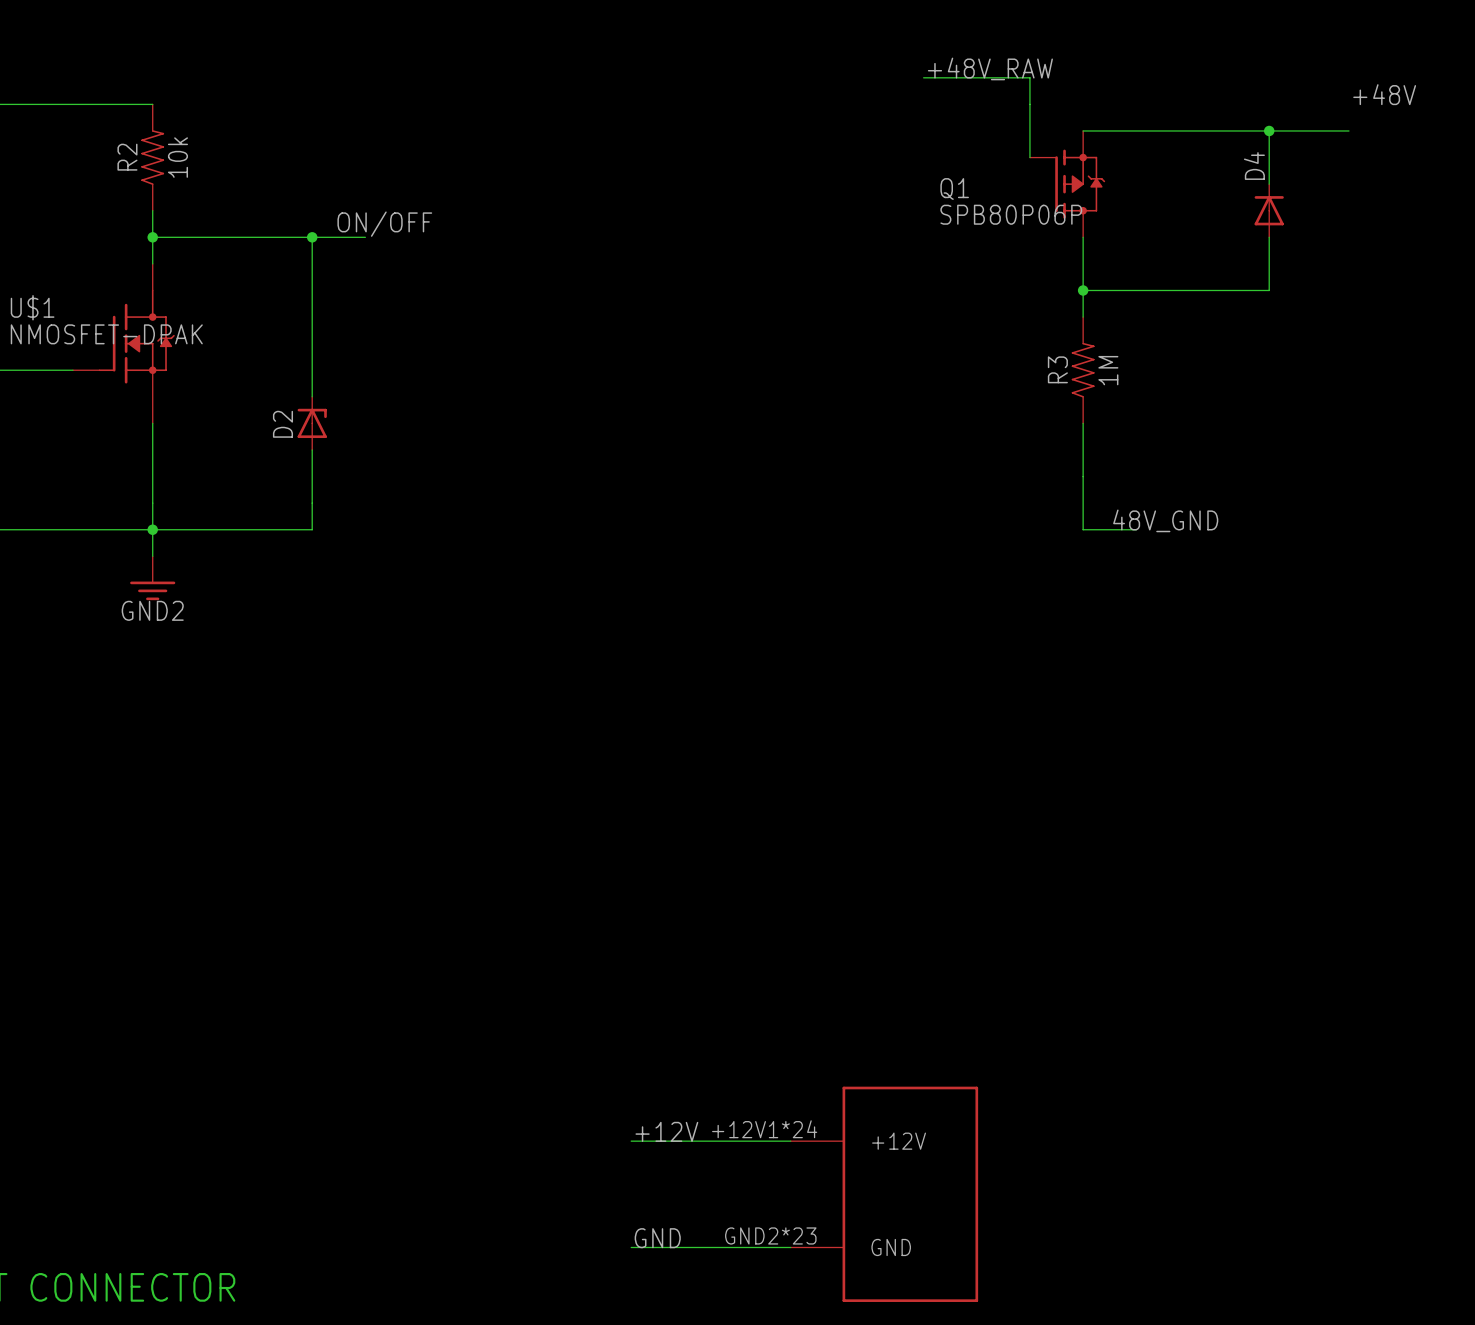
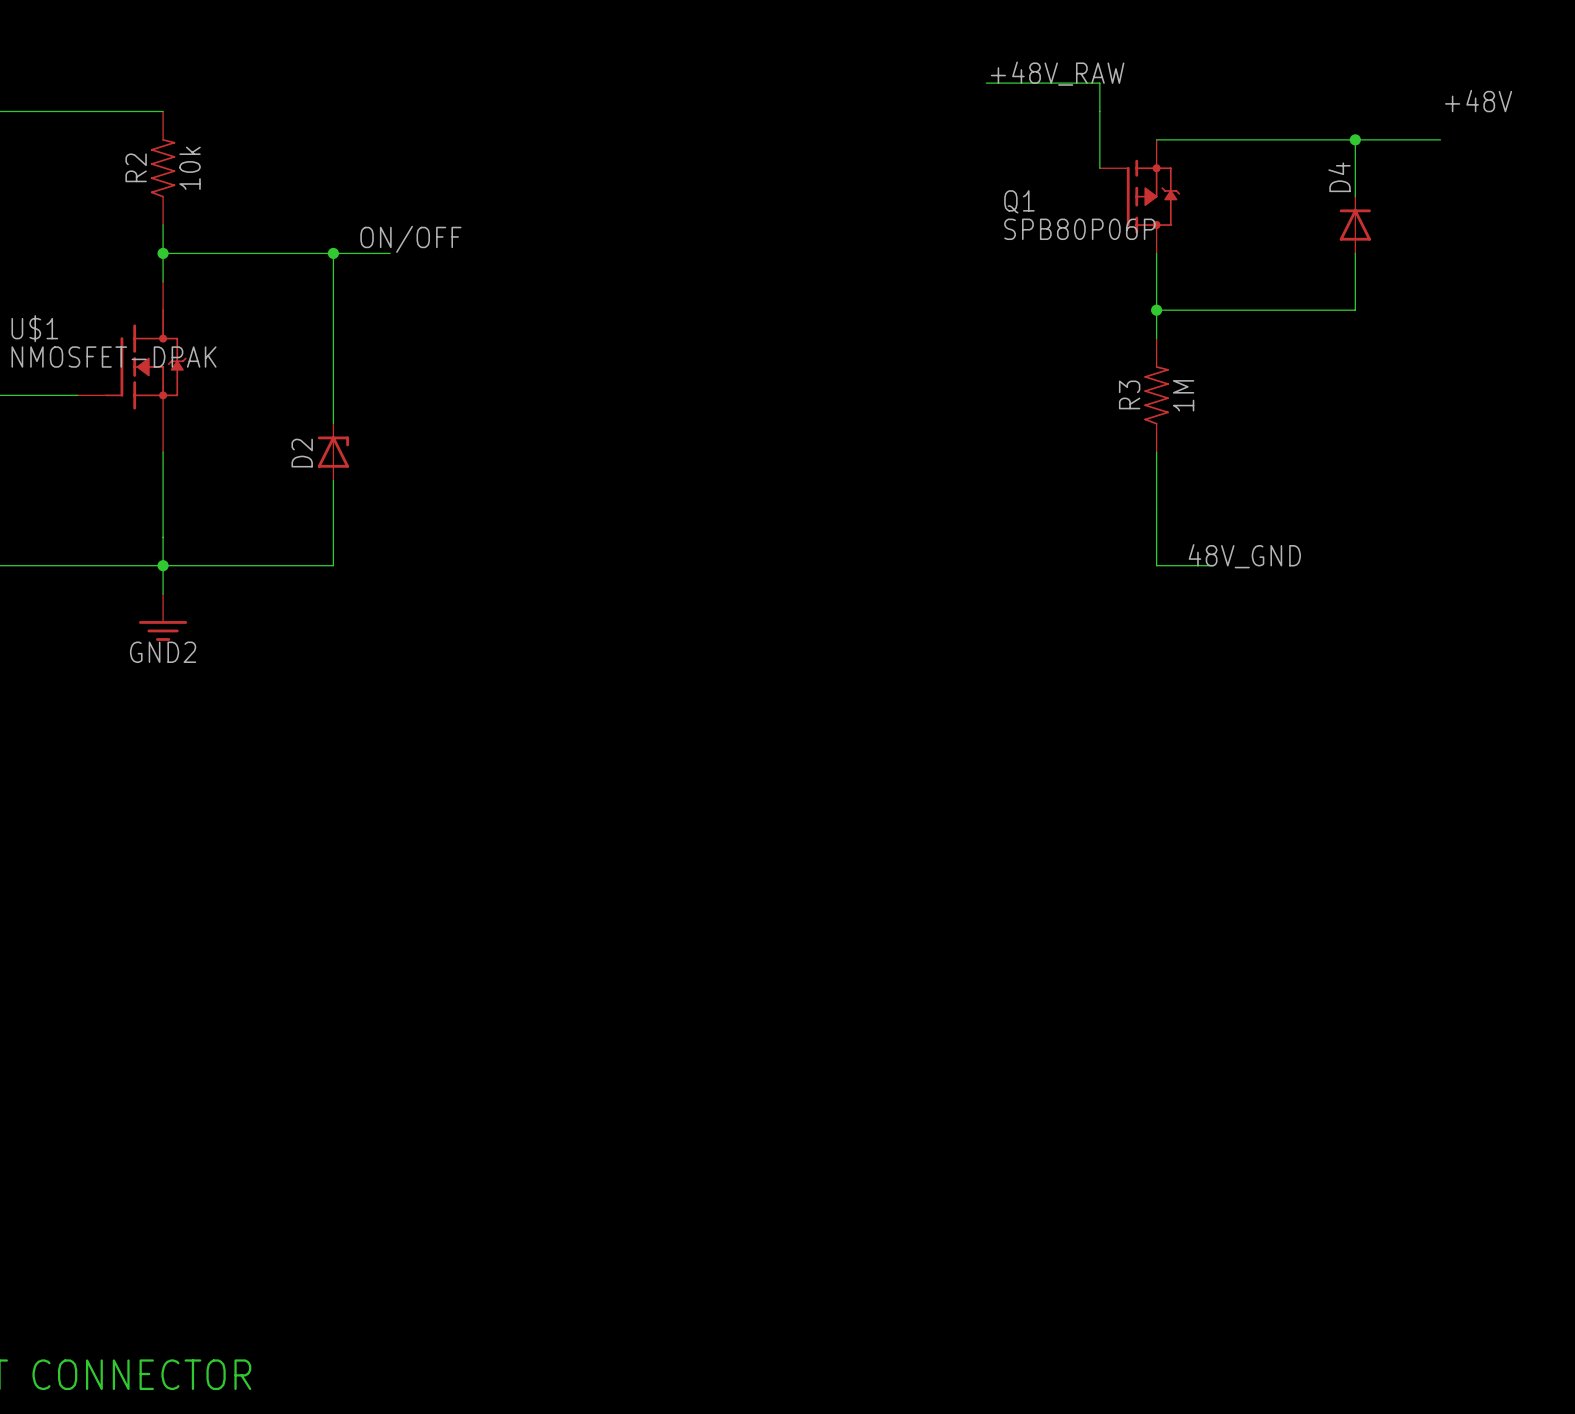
label: +12V (666, 1131) -> none
wire: (631, 1141) (790, 1141) -> none
part: (884, 1194) -> none
label: GND (657, 1238) -> none
wire: (631, 1247) (790, 1247) -> none

